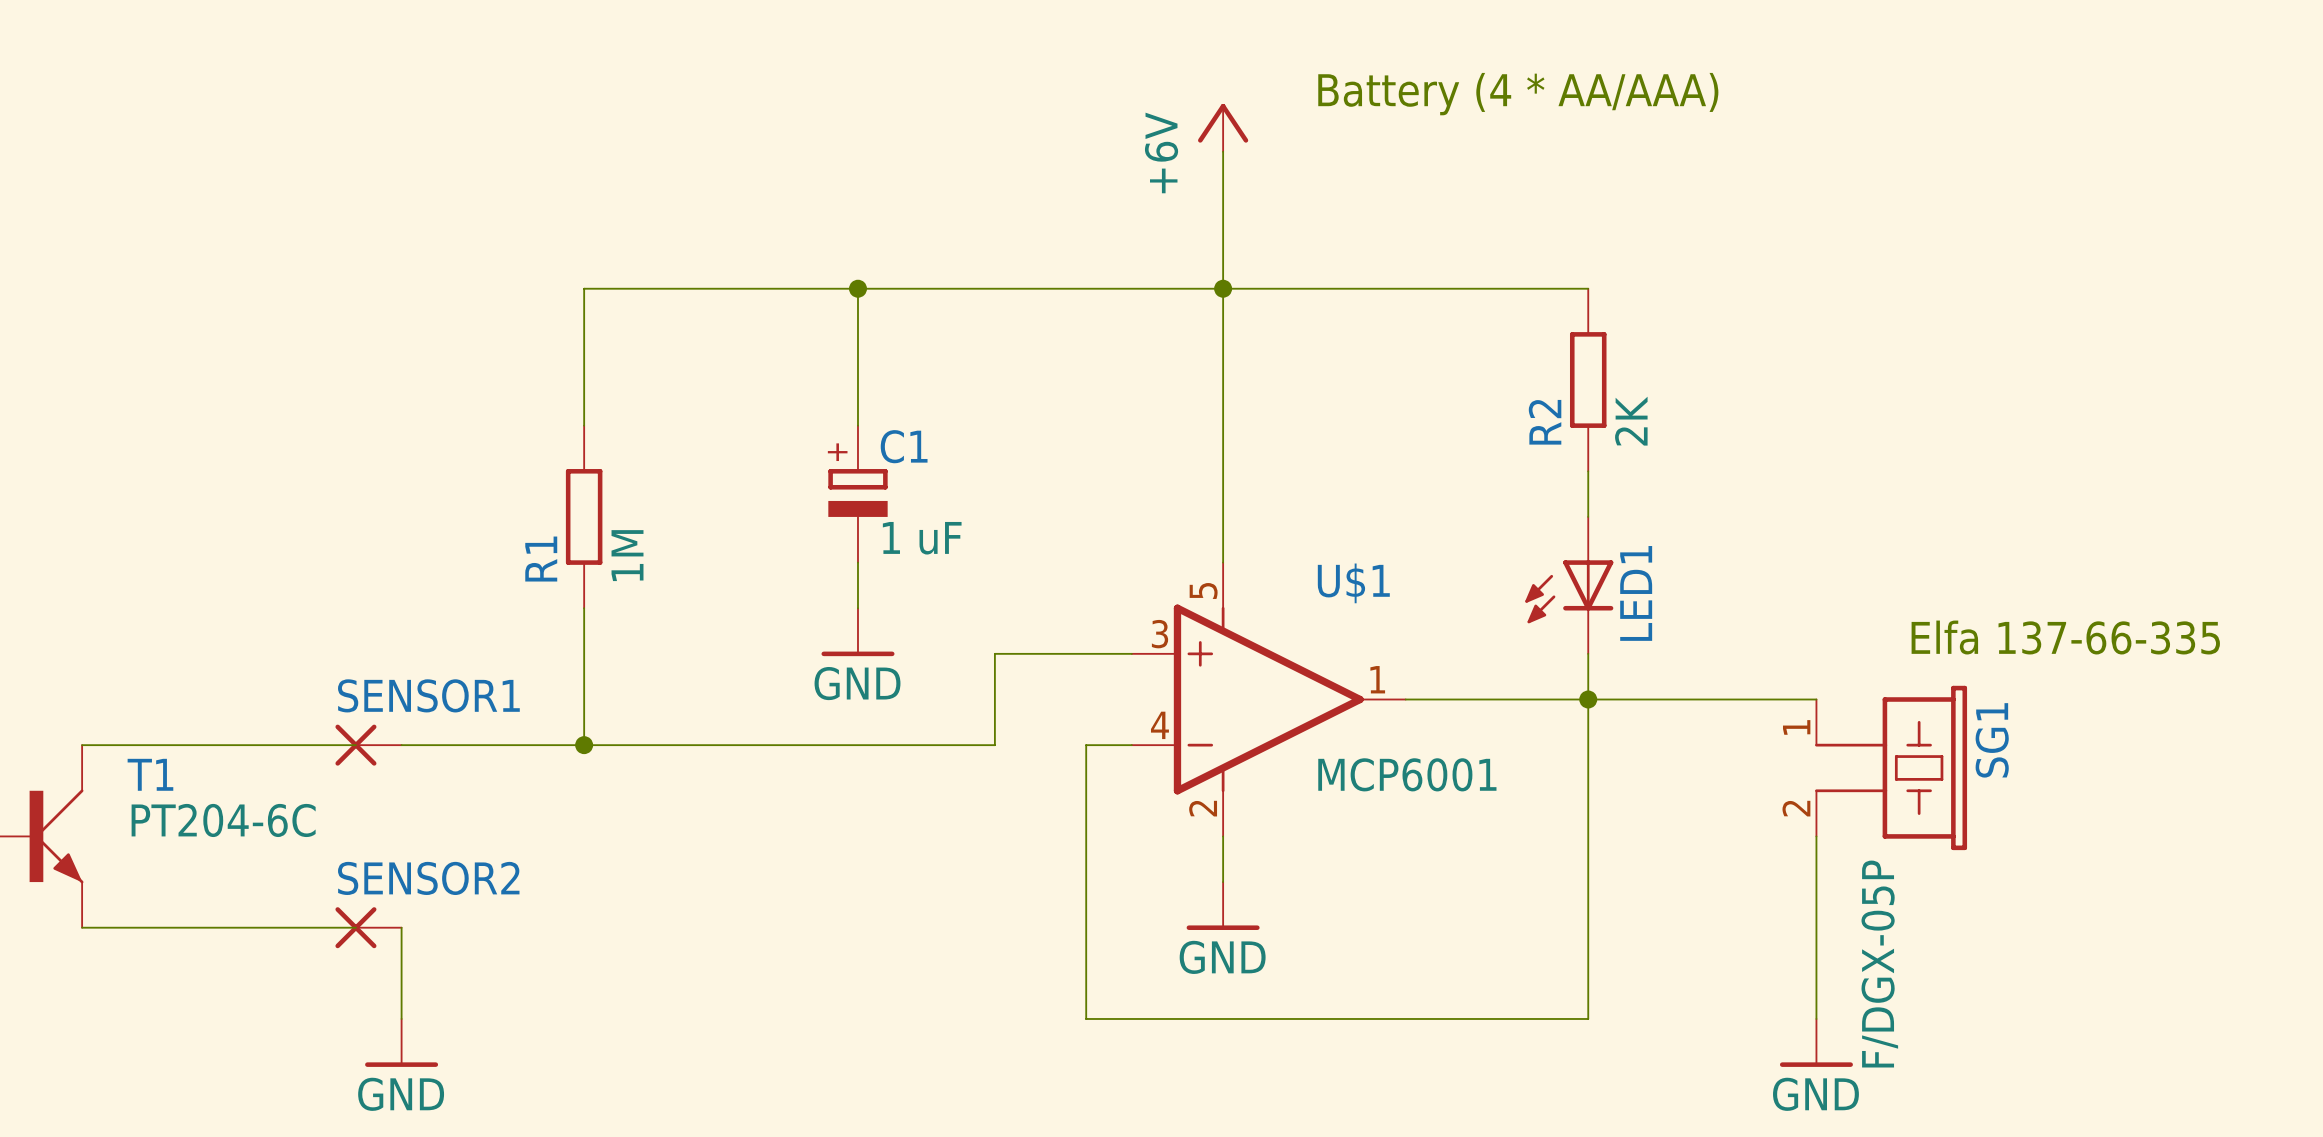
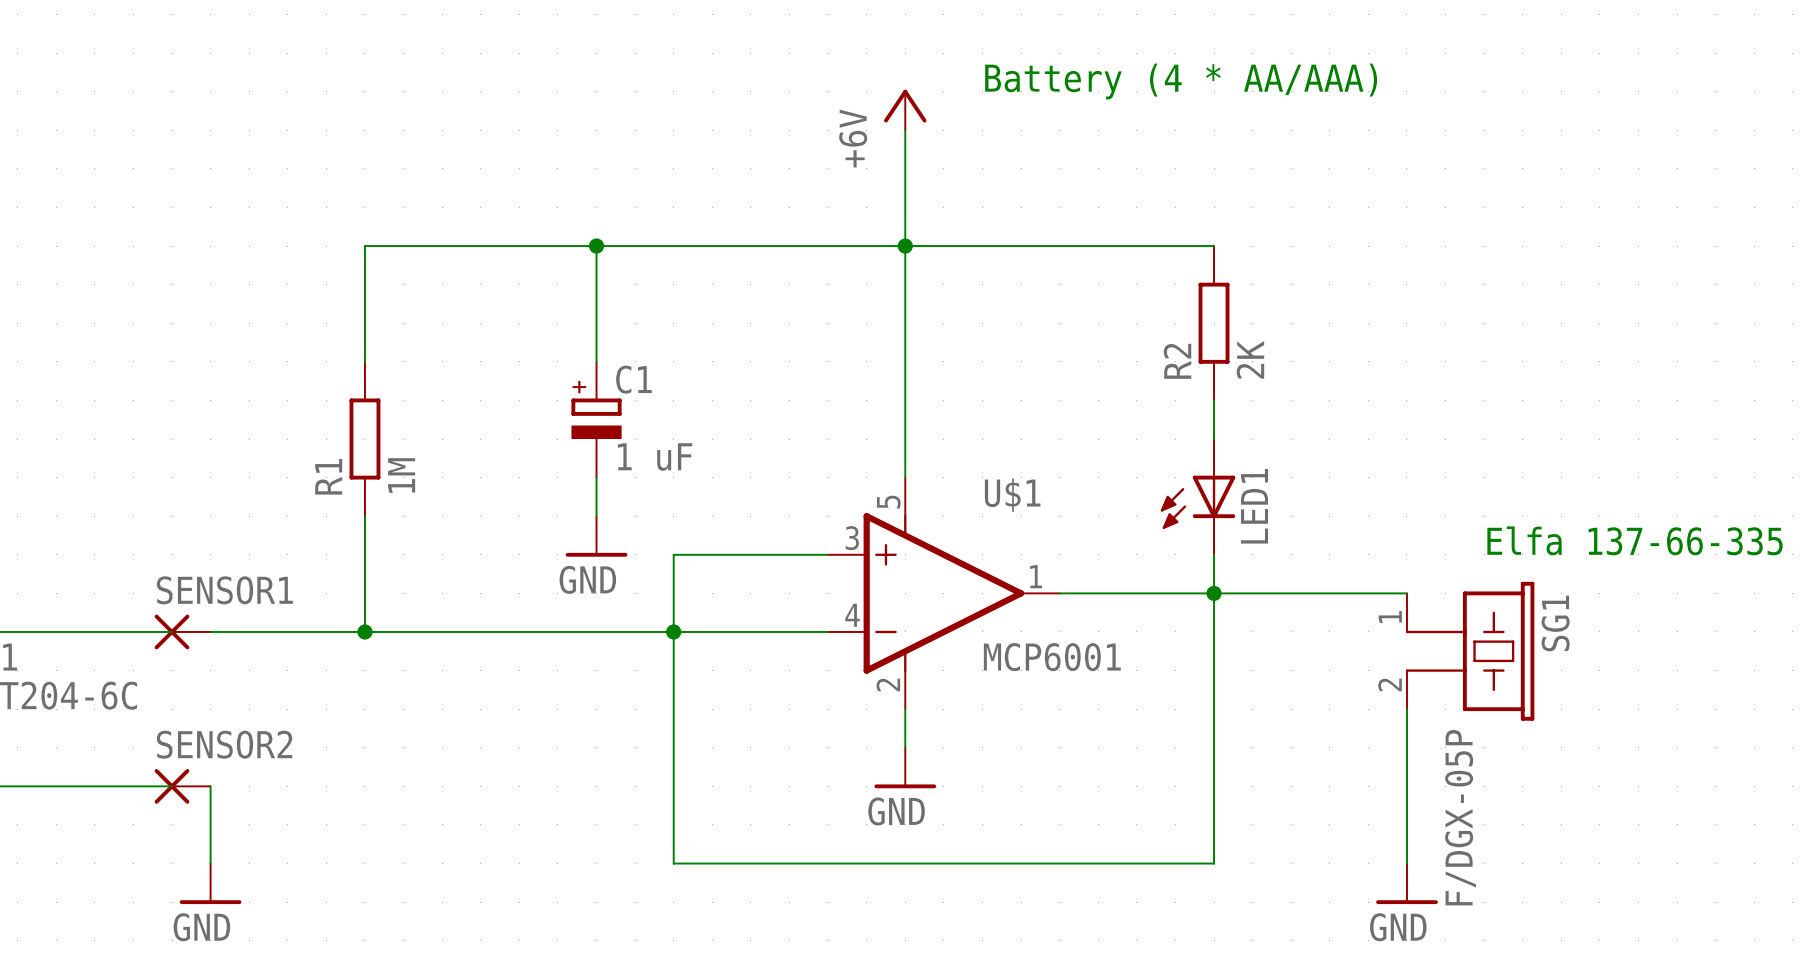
wire: (994, 653) (994, 745) -> (789, 631) (712, 631)
junction: none -> (673, 631)
wire: (1086, 745) (1086, 1018) -> (712, 554) (673, 554) (673, 863) (789, 863)

